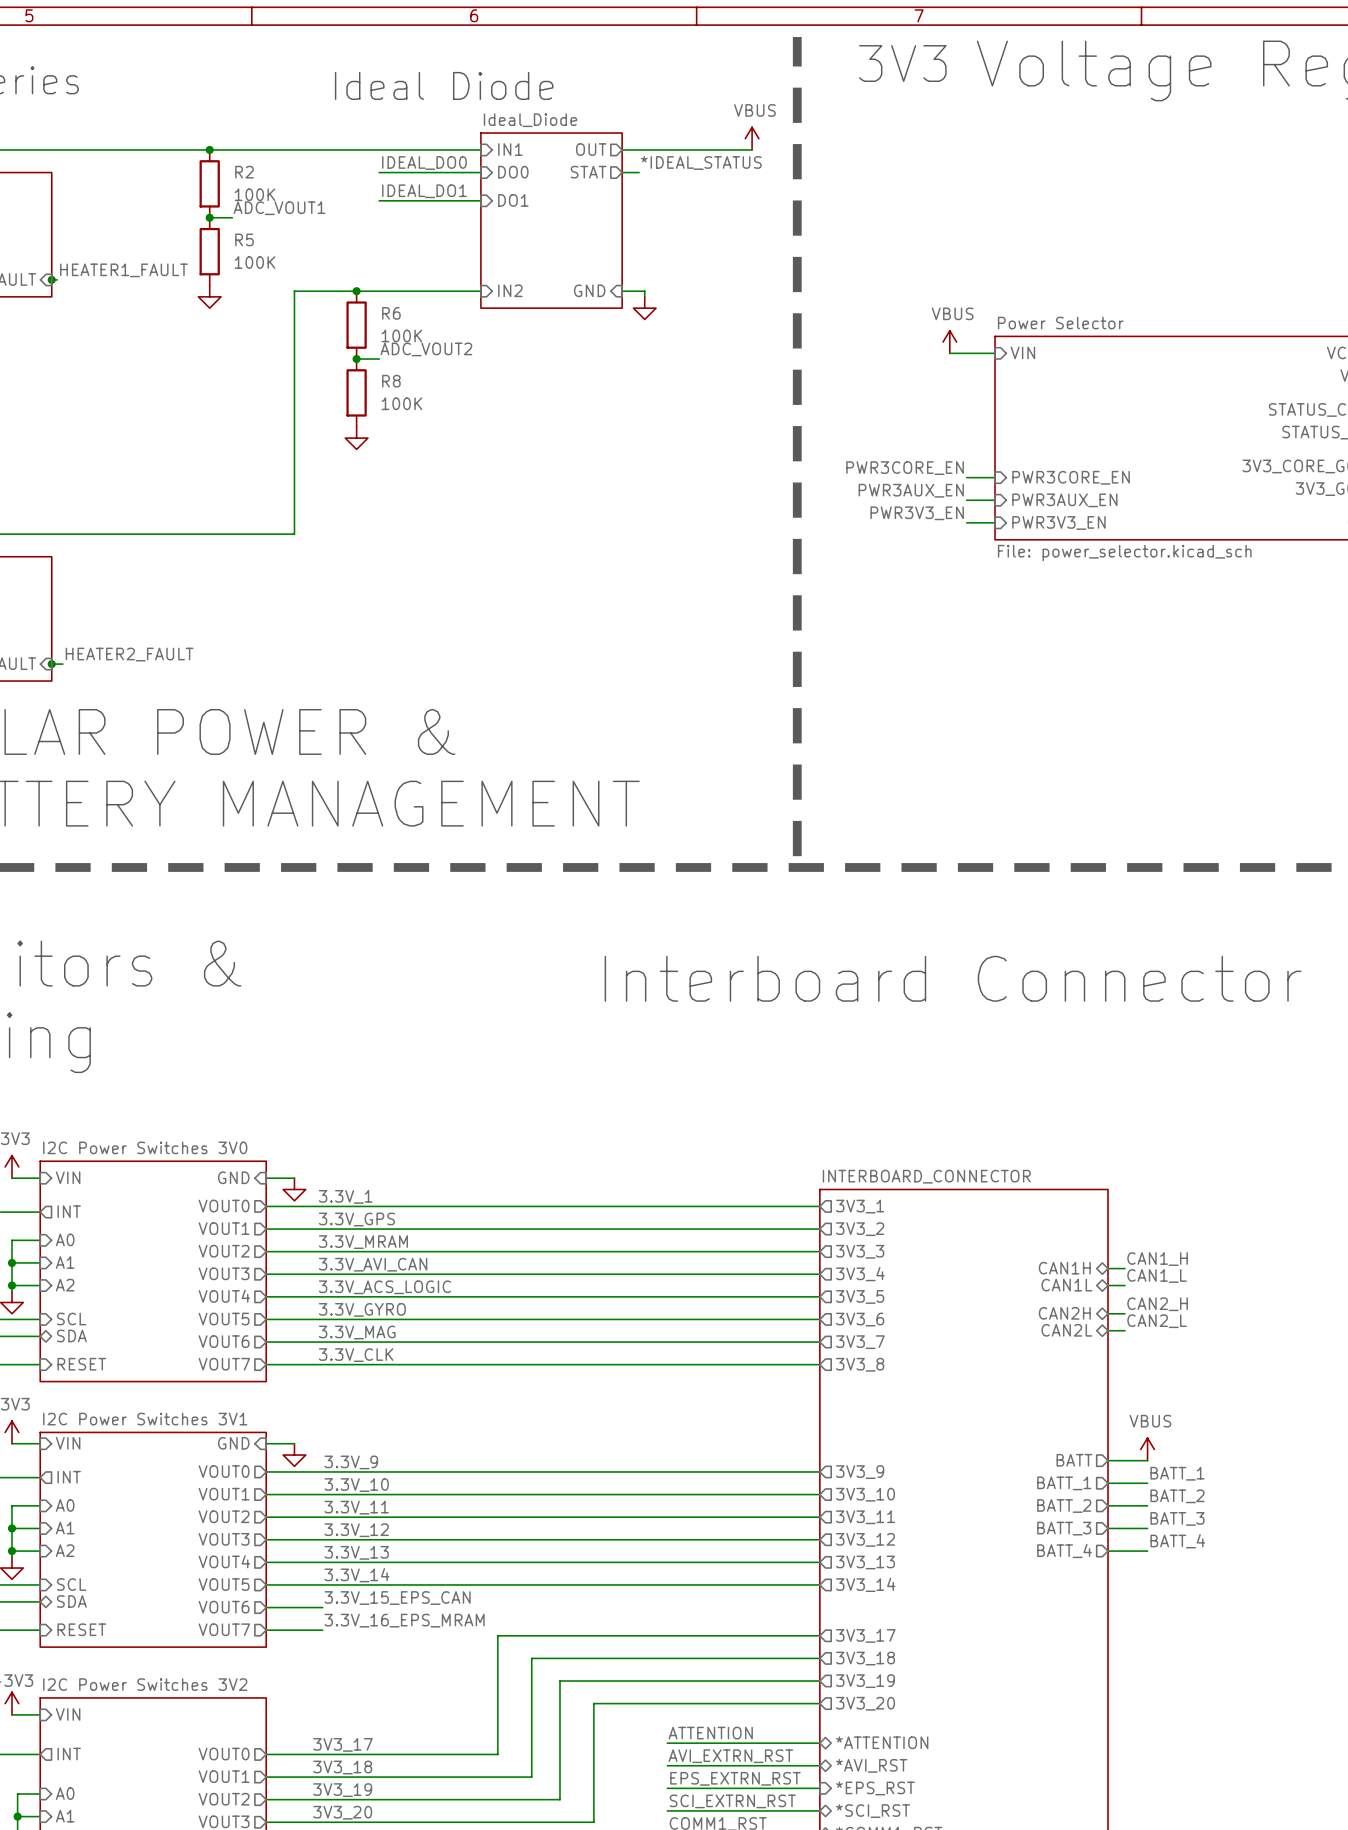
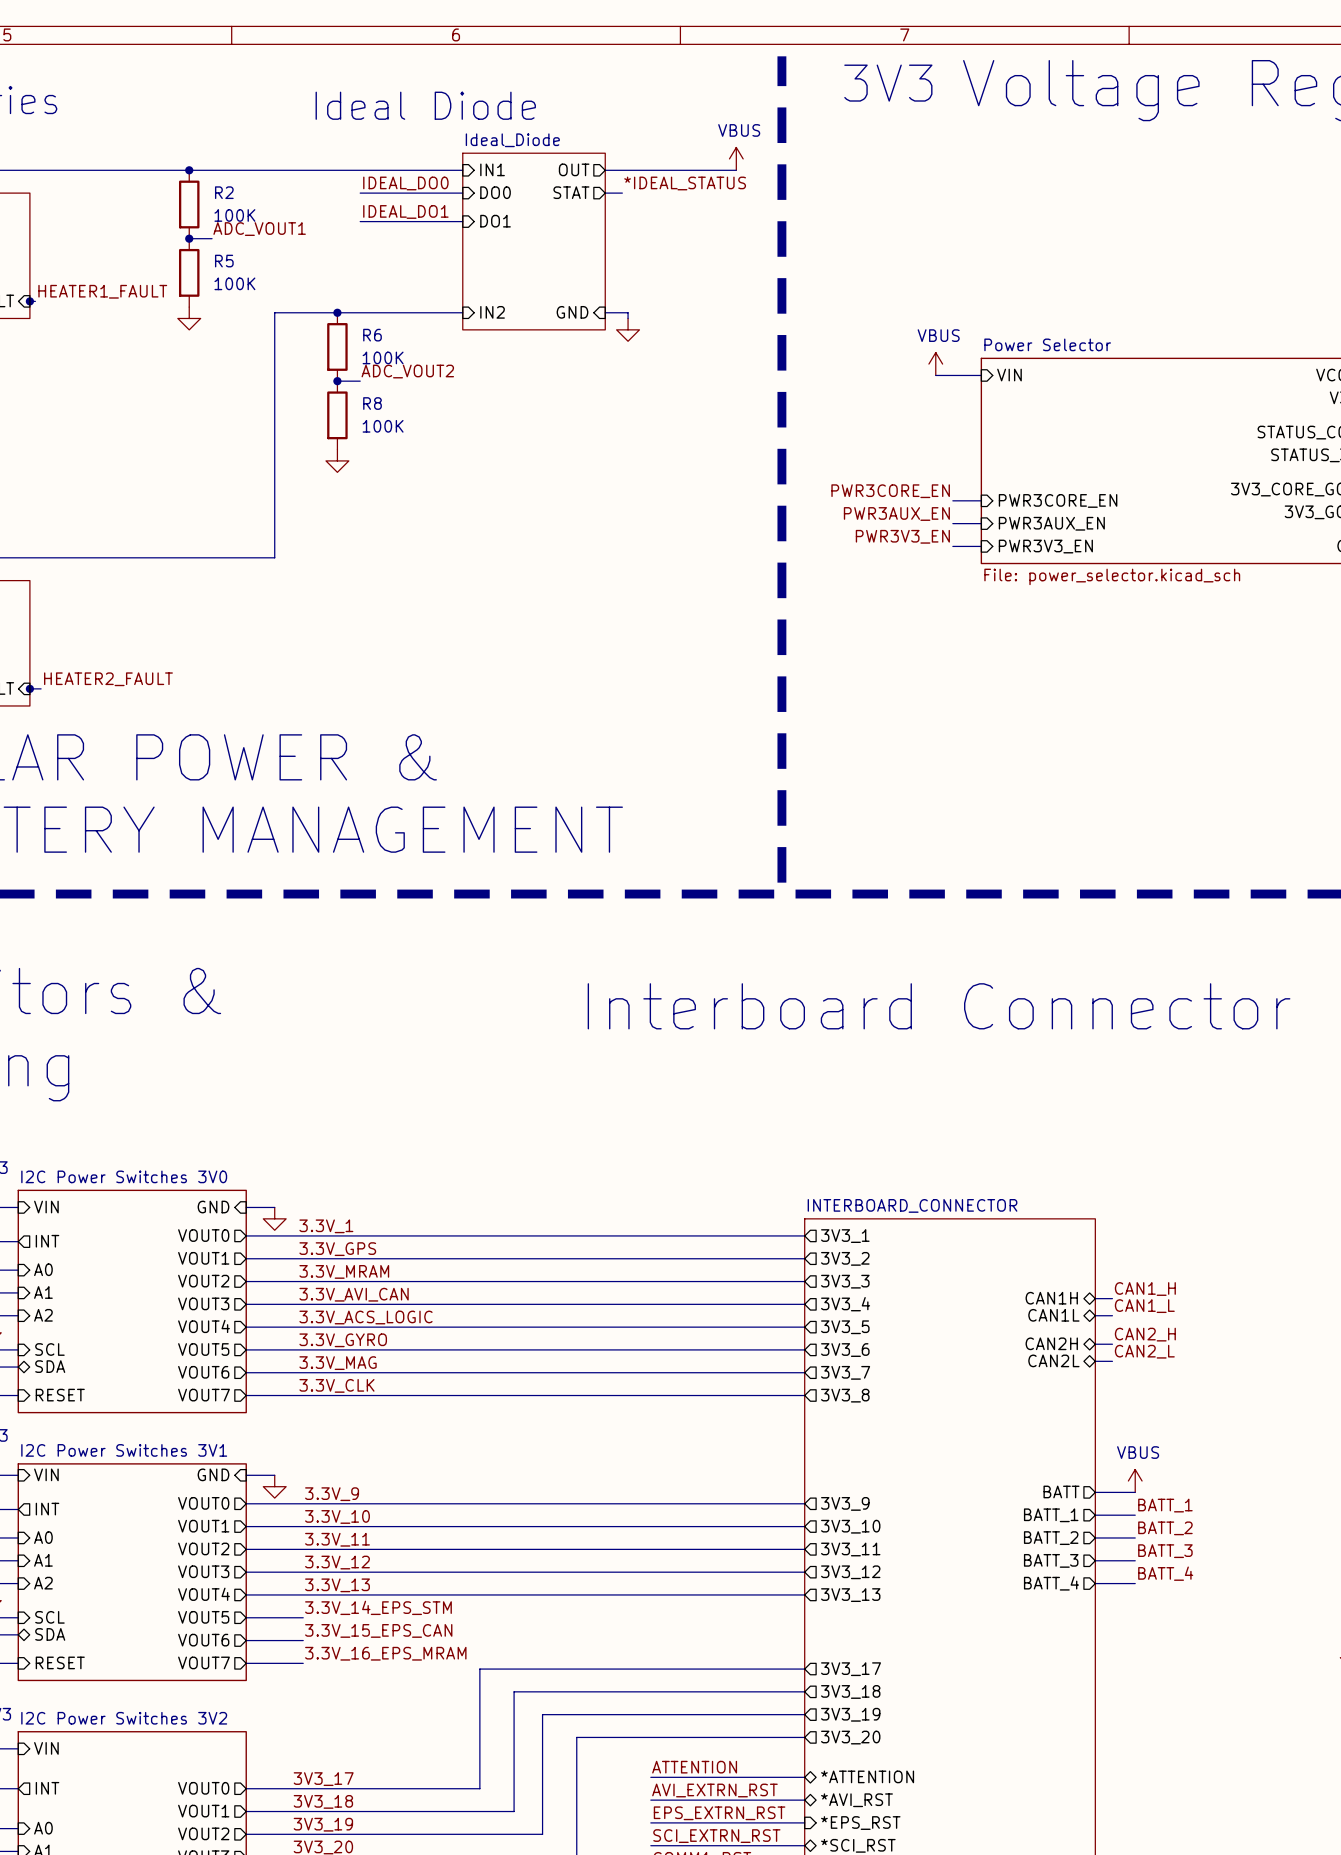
label: 3.3V_14 (356, 1575) -> 3.3V_14_EPS_STM (378, 1607)
wire: (322, 1584) (819, 1584) -> none
sheet pin: 3V3_14 (865, 1584) -> none

